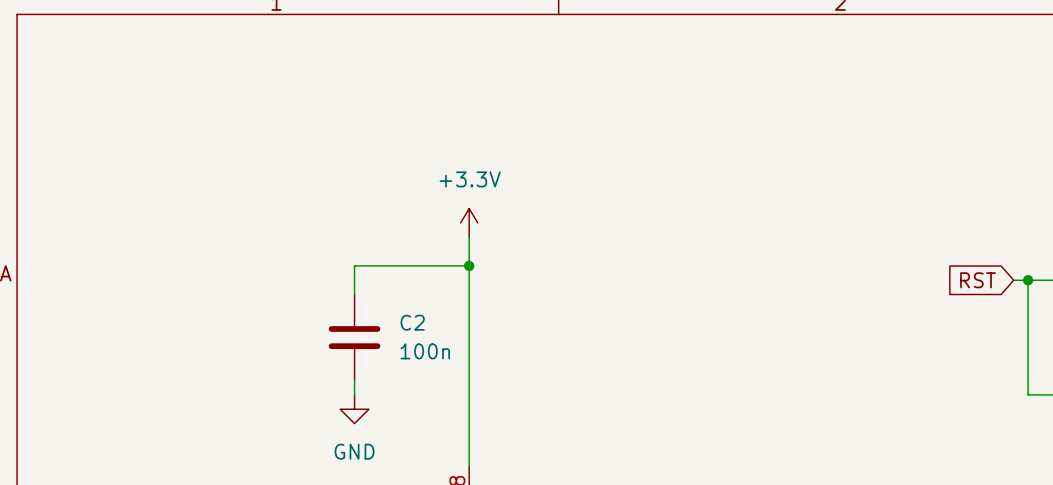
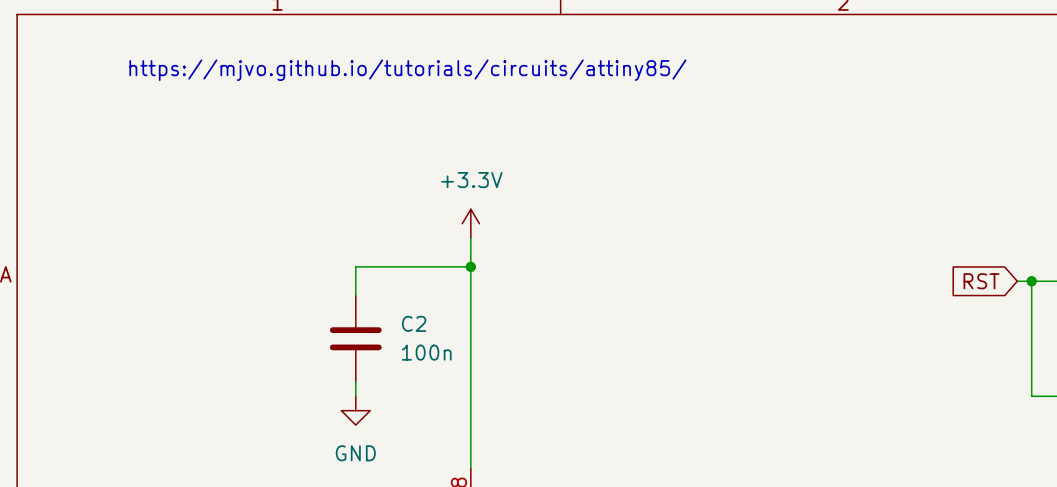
text: none -> https://mjvo.github.io/tutorials/circuits/attiny85/ (407, 70)

